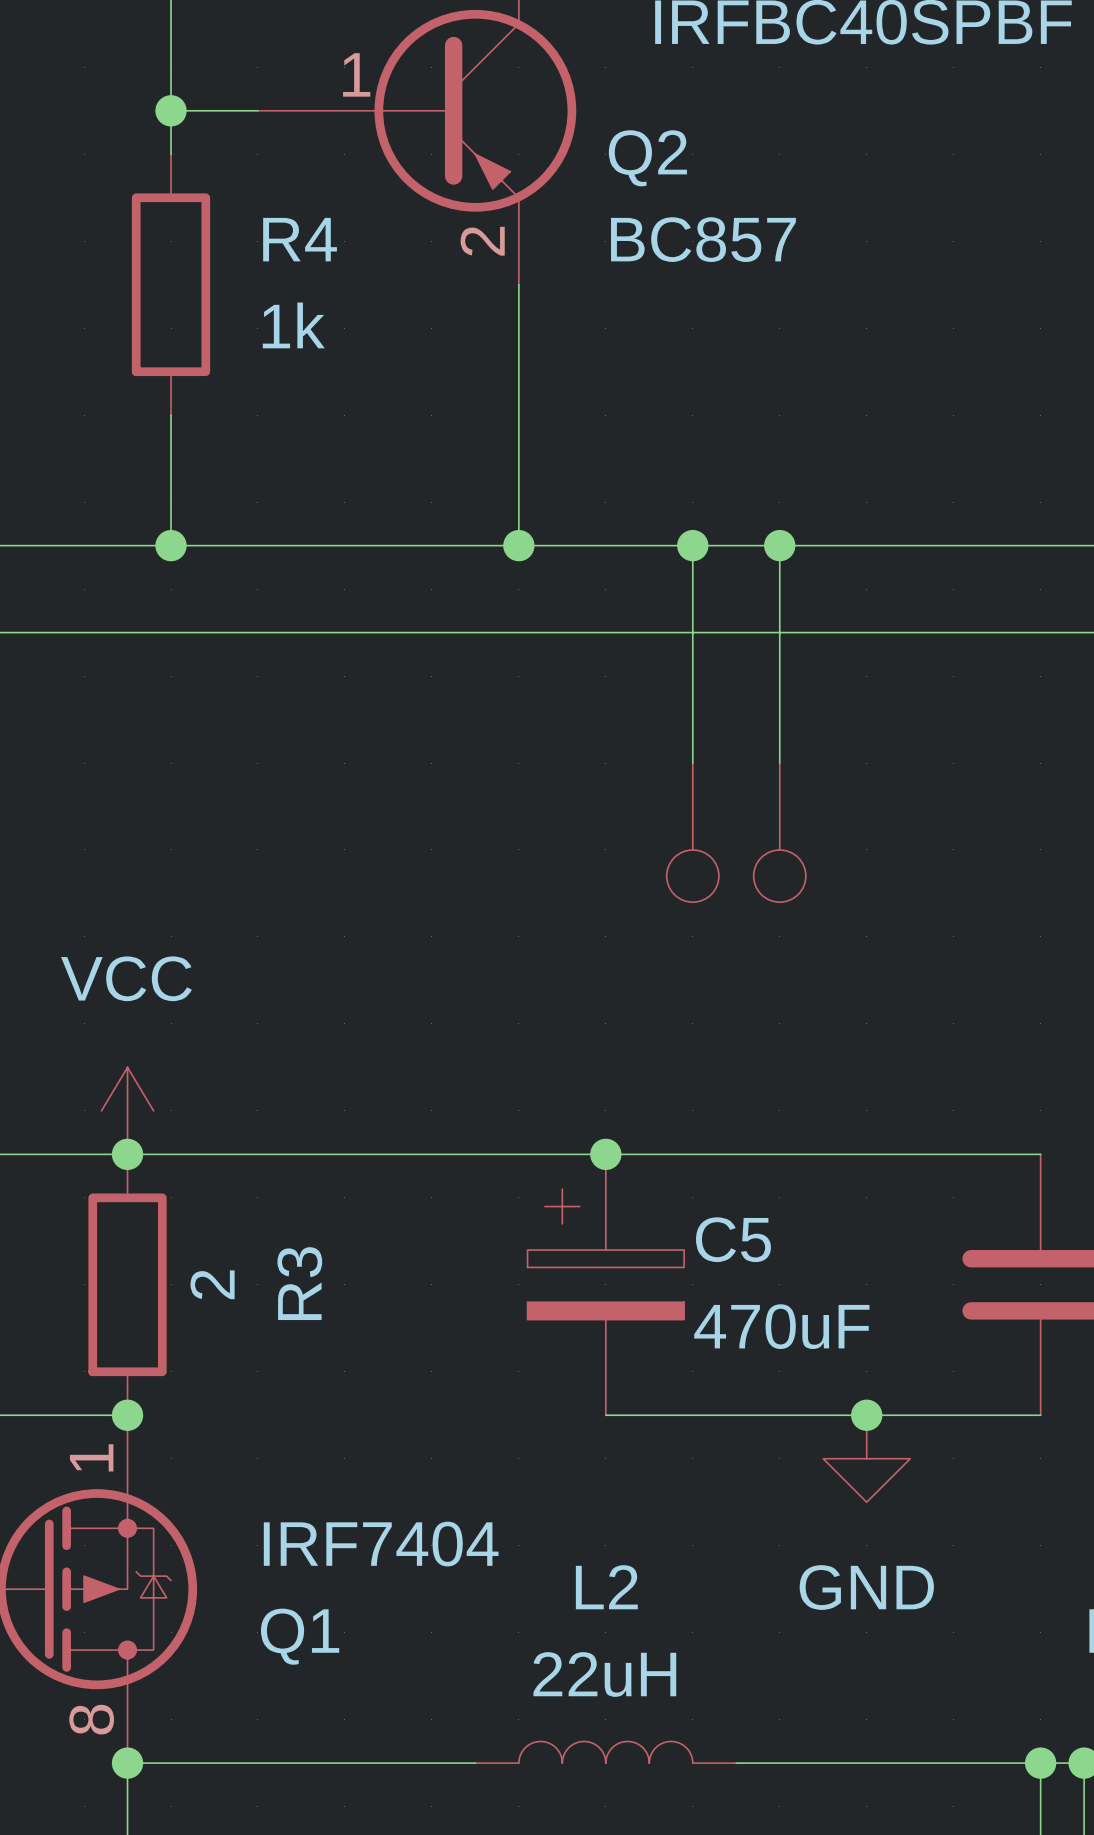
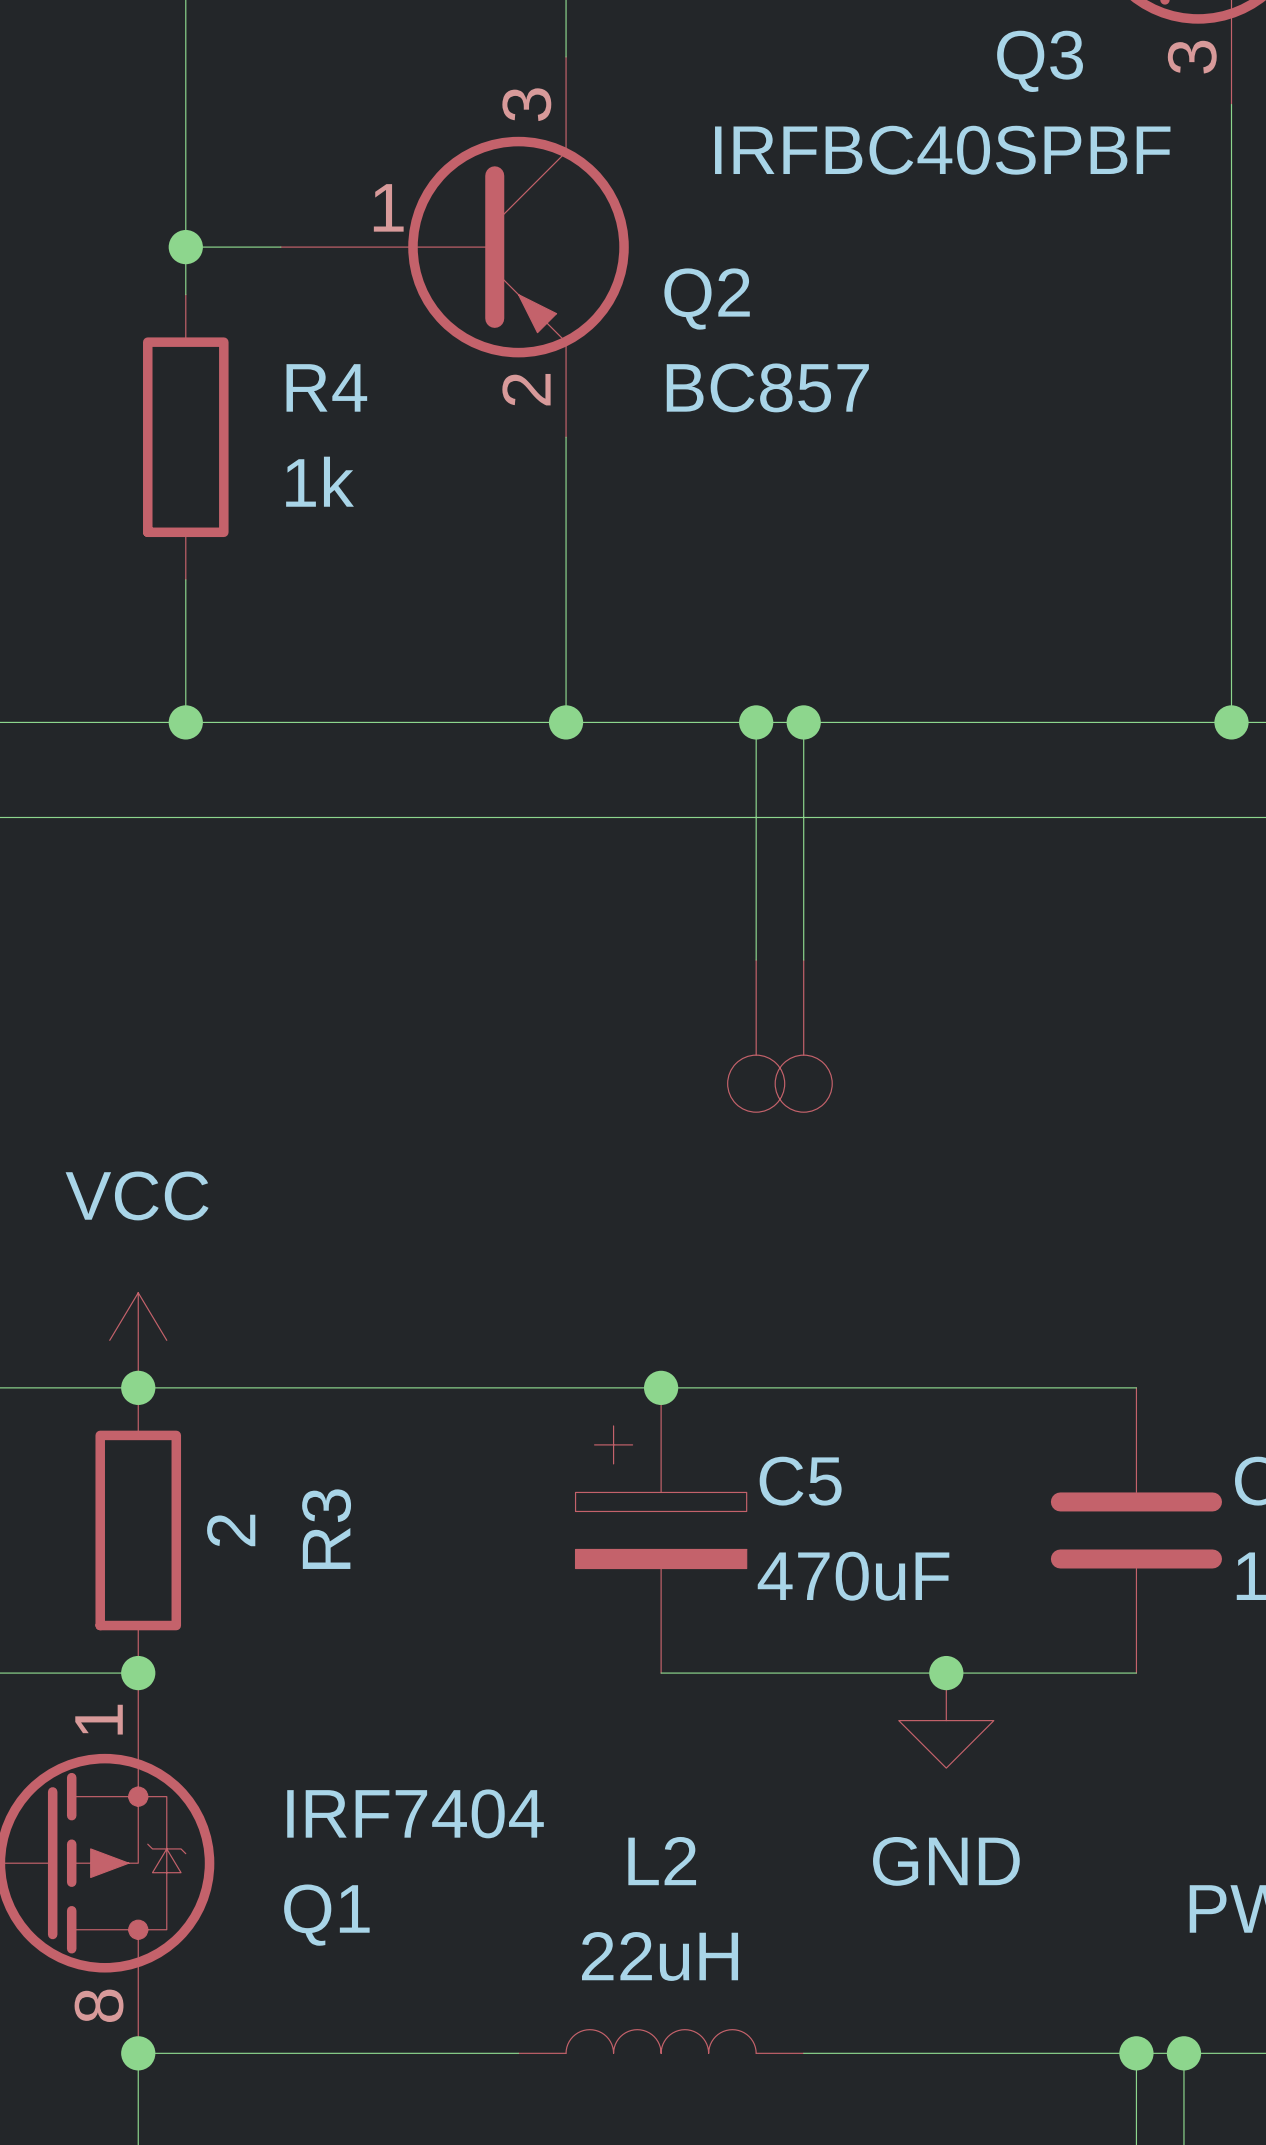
wire: (779, 545) (779, 763) -> (803, 722) (803, 960)
junction position: (779, 545) -> (803, 722)
part position: (779, 832) -> (803, 1036)

